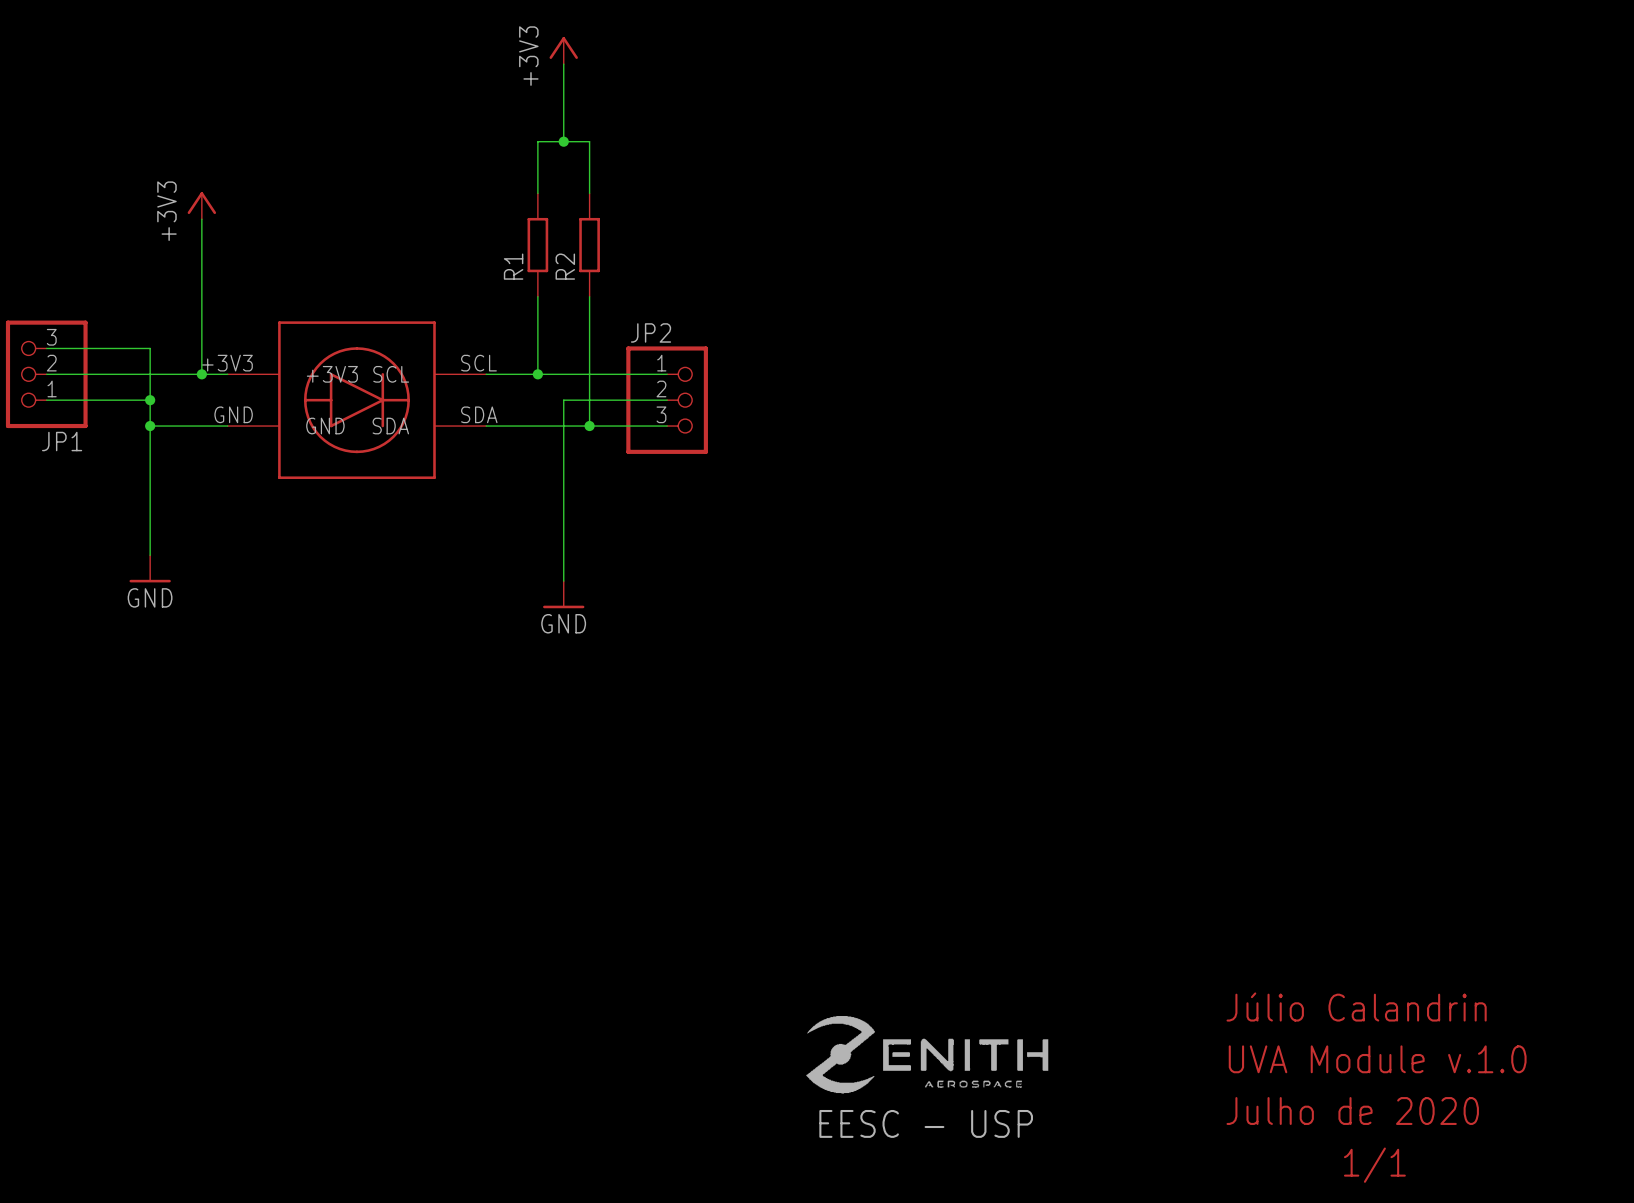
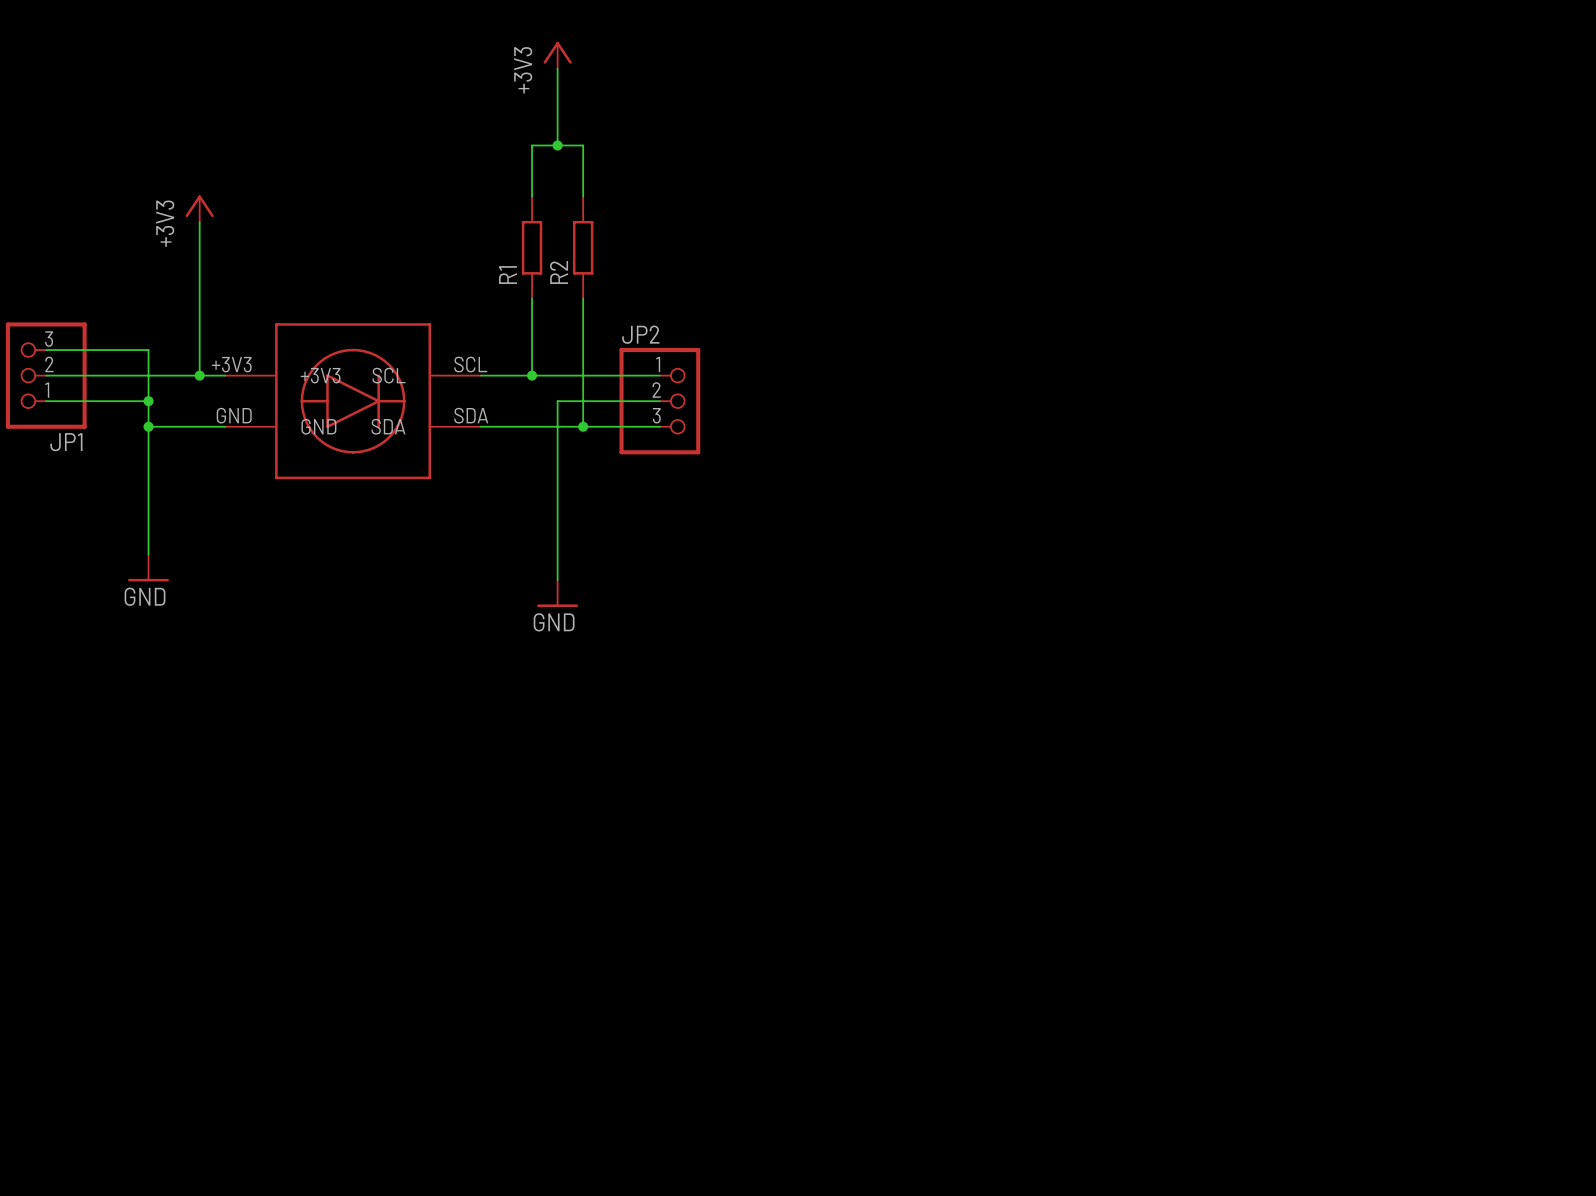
text: Júlio Calandrin (1356, 1006) -> none
drawing: [806, 1016, 1049, 1094] -> none
text: UVA Module v.1.0 (1377, 1059) -> none
text: Julho de 2020 (1352, 1111) -> none
text: EESC - USP (926, 1123) -> none
text: 1/1 (1374, 1165) -> none

